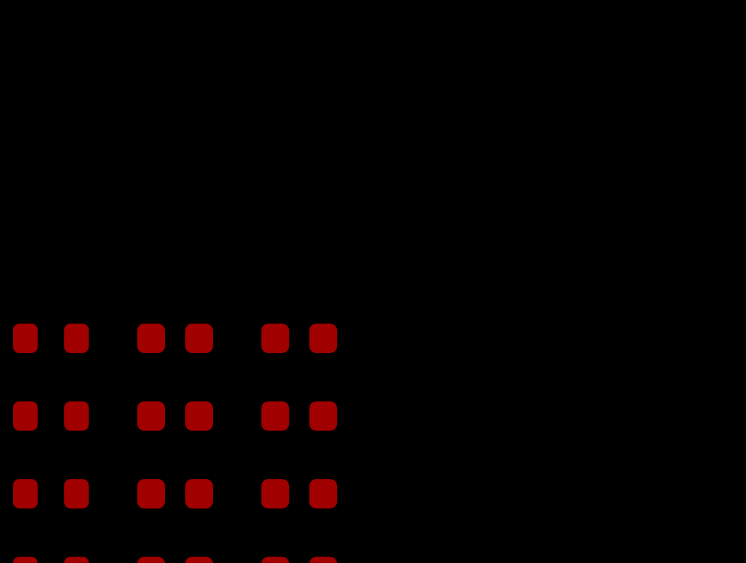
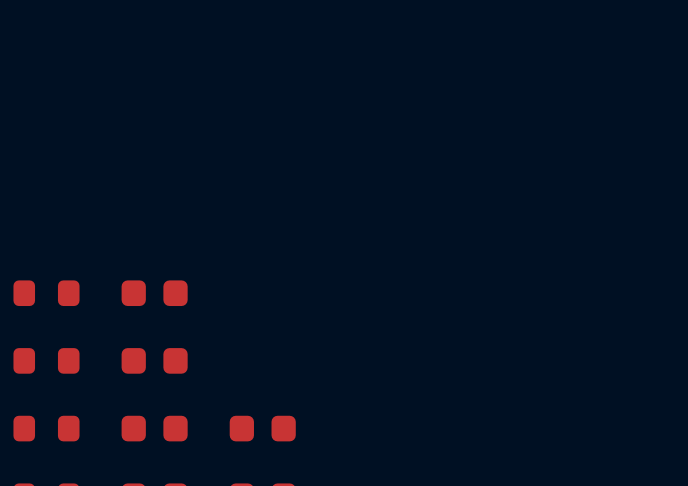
part: (299, 338) -> none
part: (299, 416) -> none

